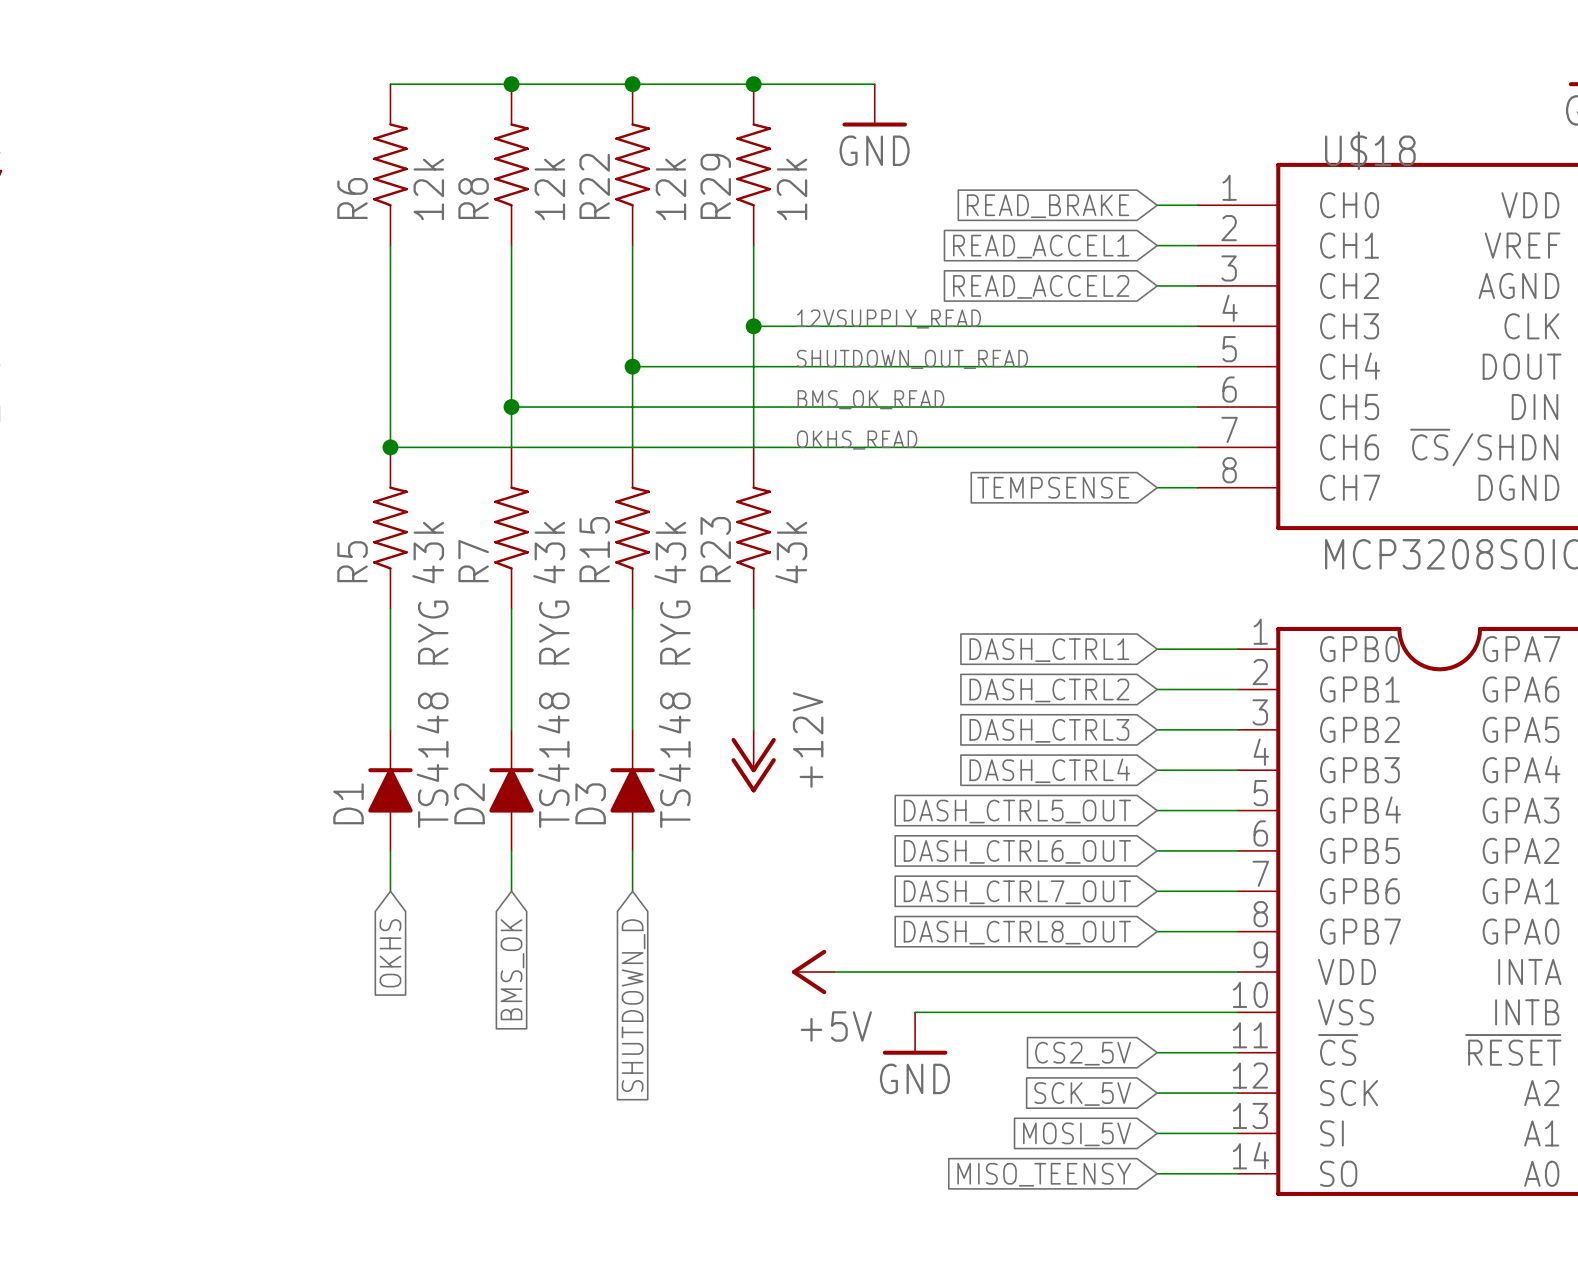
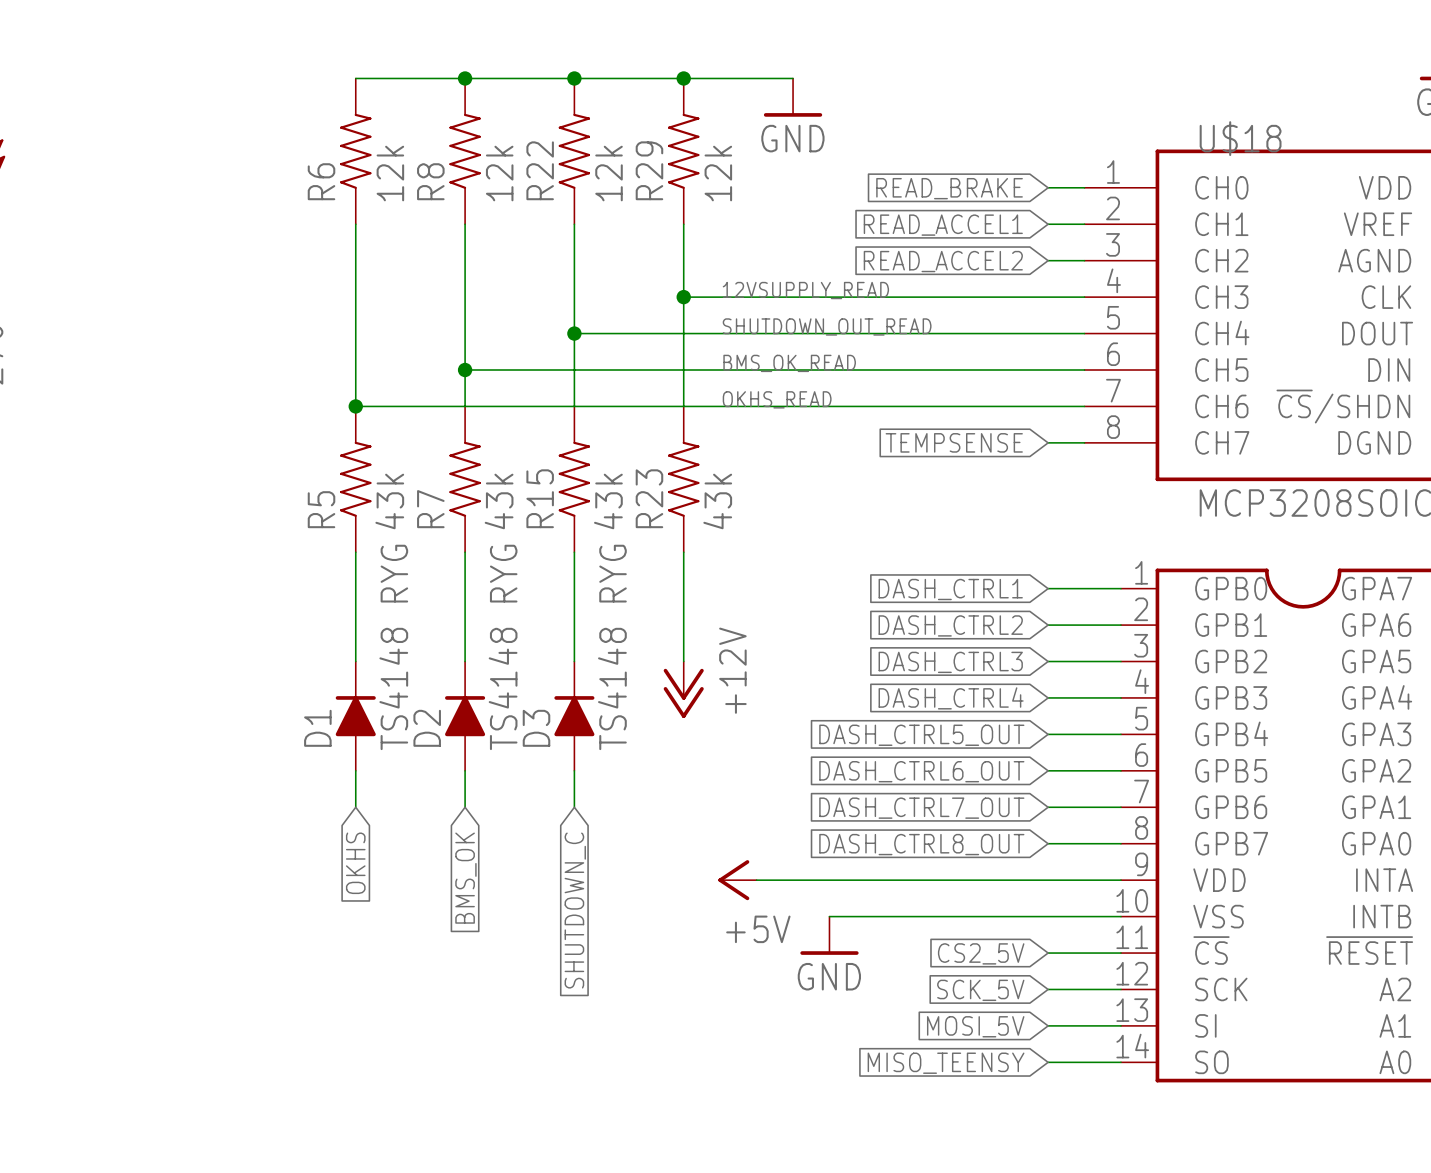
global label: SHUTDOWN_D (633, 1005) -> SHUTDOWN_C (575, 910)

